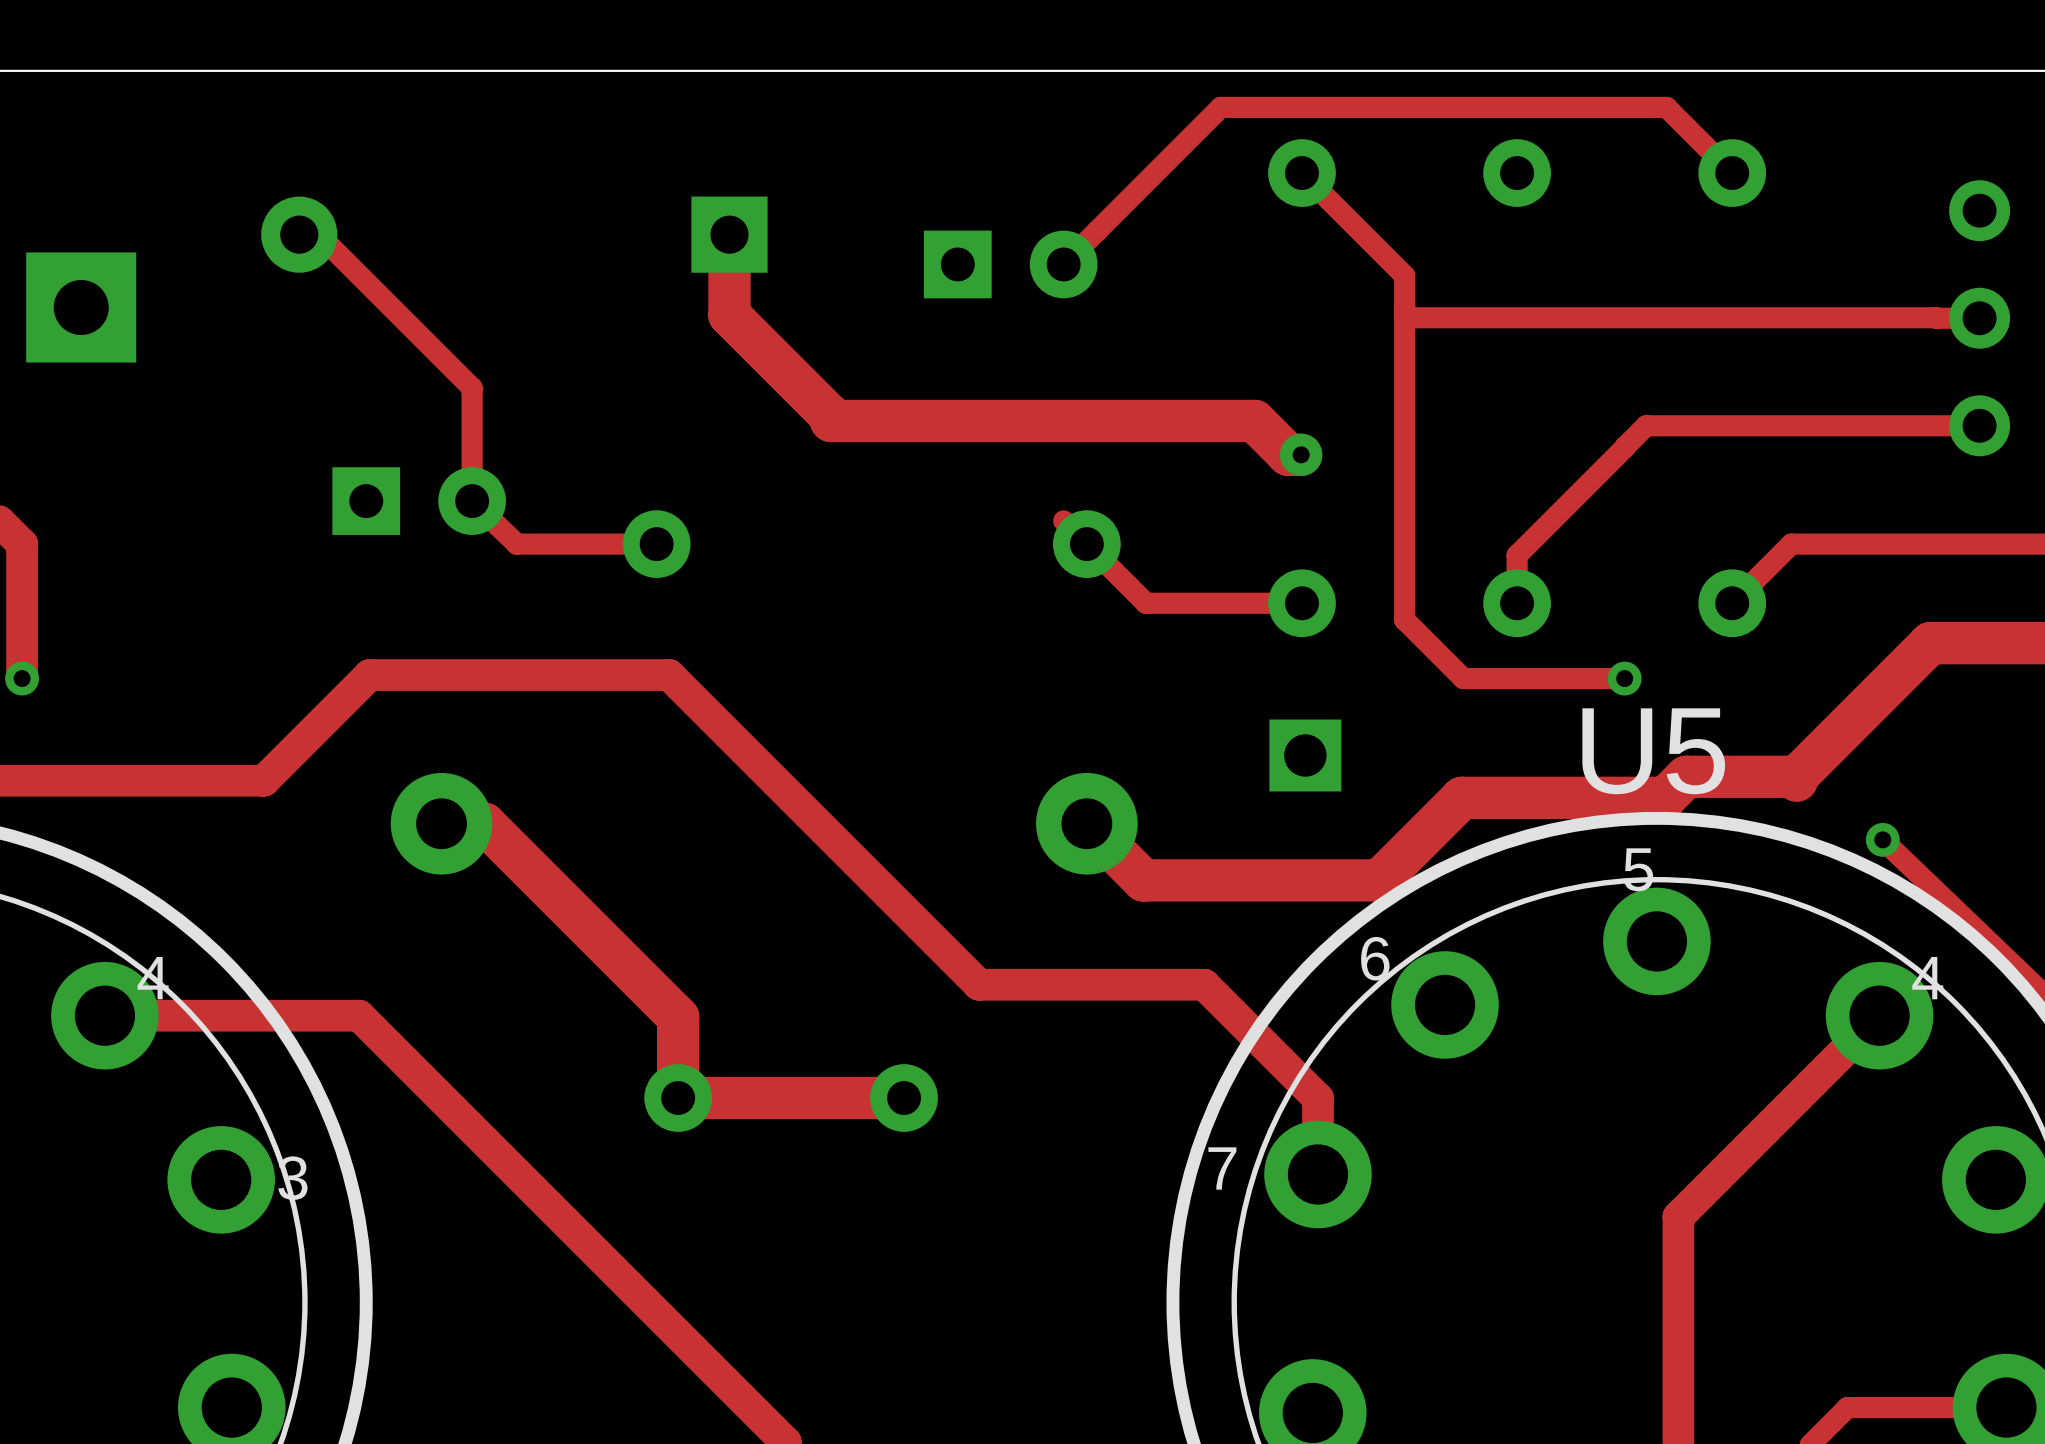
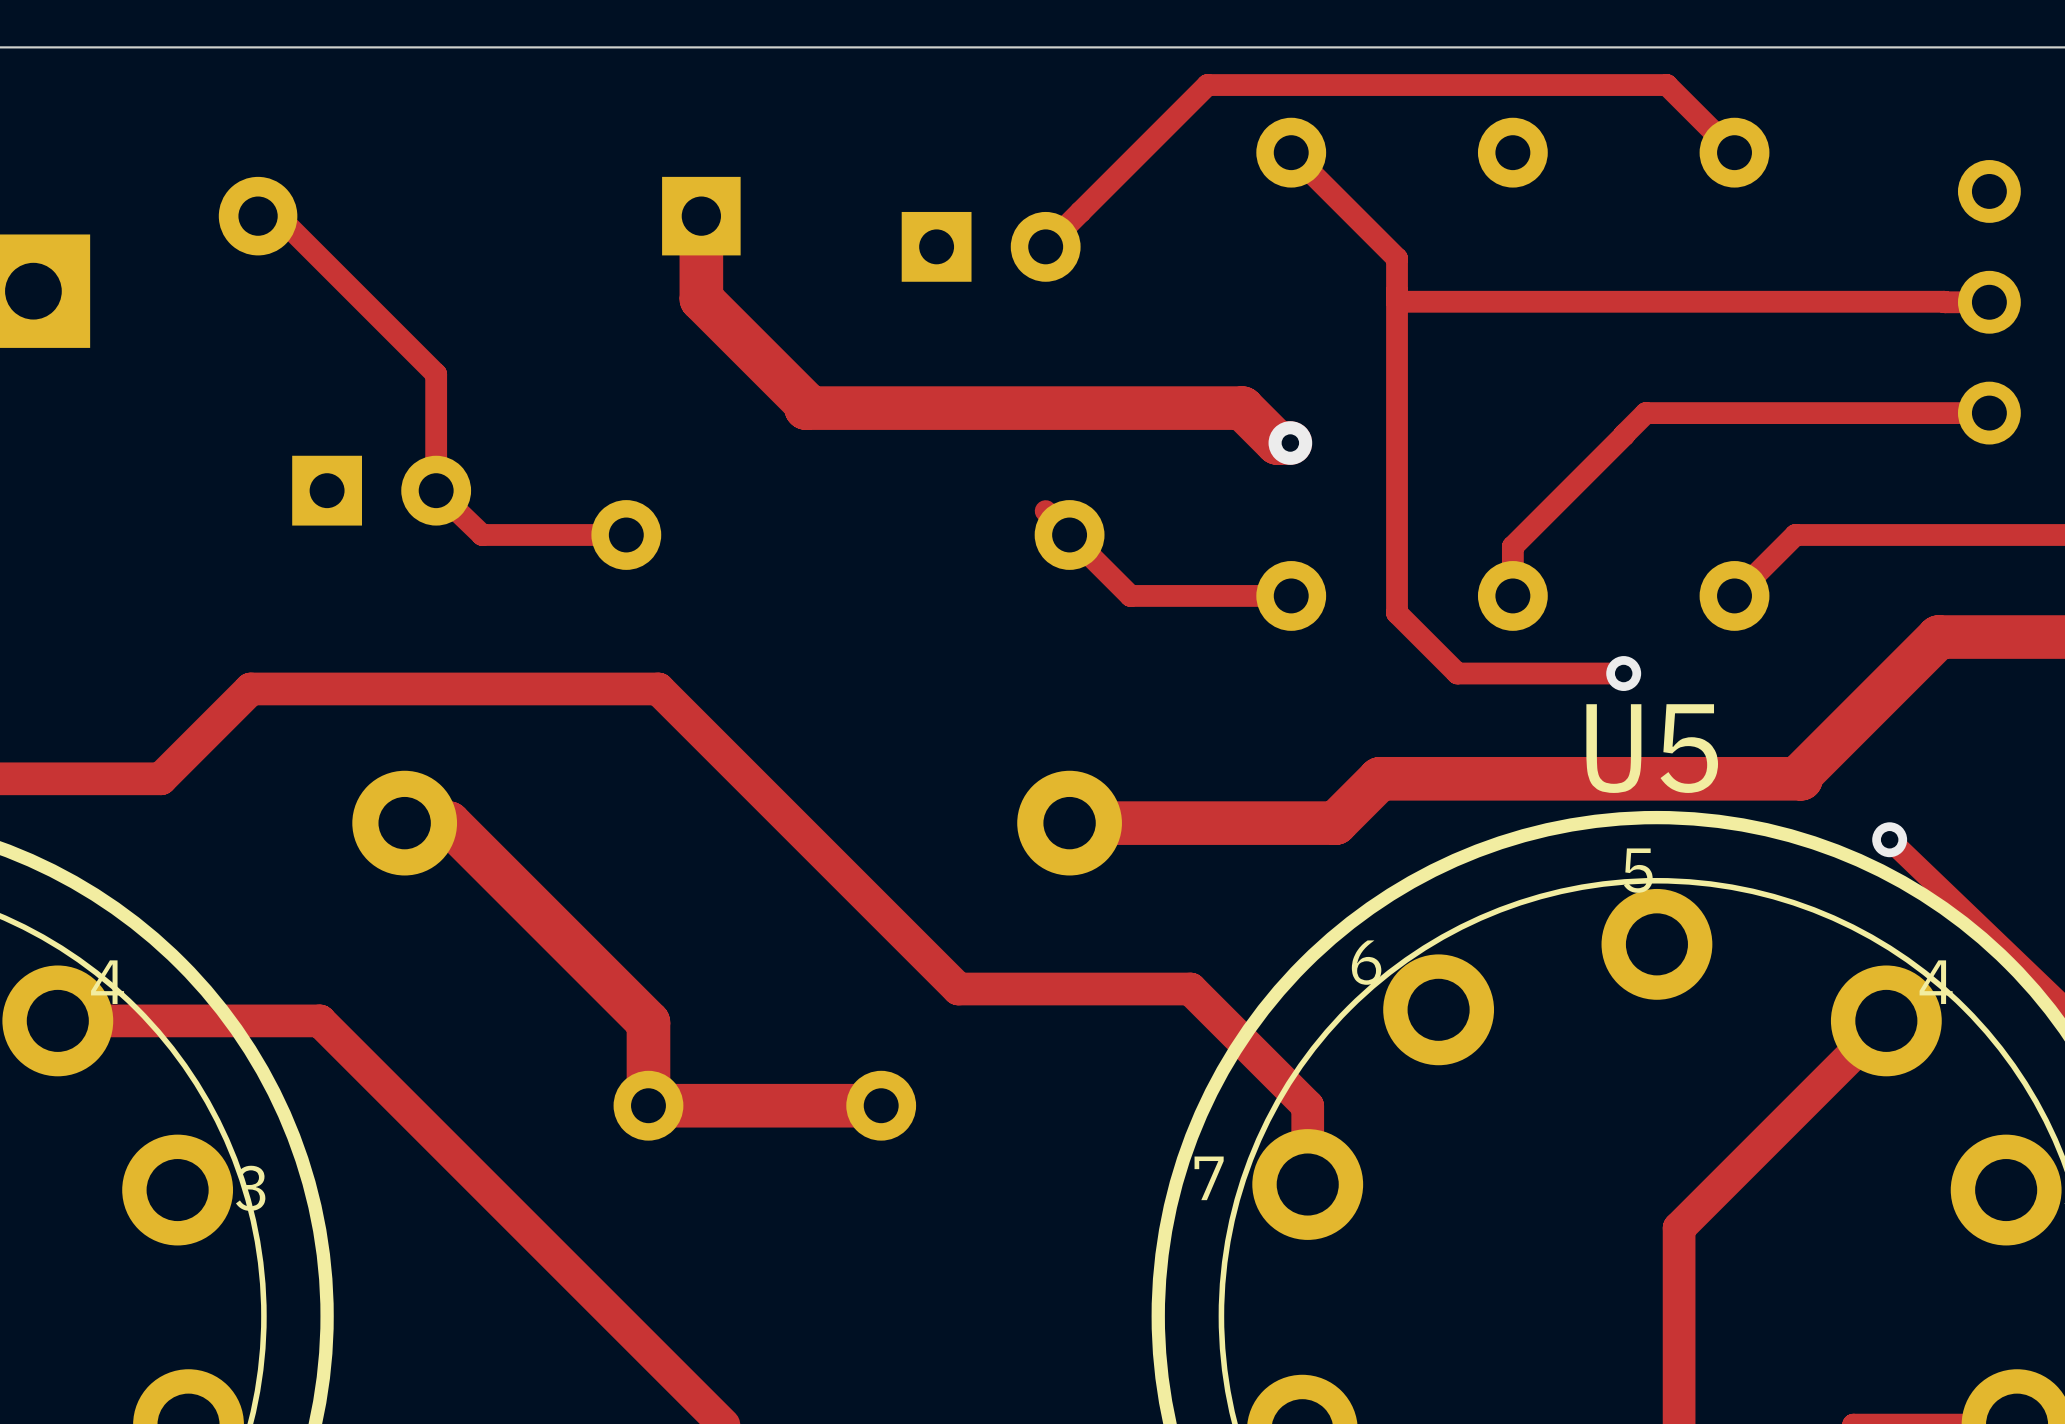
track: (687, 693) (669, 675) (369, 675) (263, 780) (204, 780) -> (658, 688) (250, 688) (160, 778)
part: (1305, 755) -> none
track: (1796, 776) (1686, 776) (1665, 797) (1462, 797) (1379, 880) (1143, 880) (1086, 823) -> (1801, 778) (1379, 778) (1335, 823) (1069, 823)

